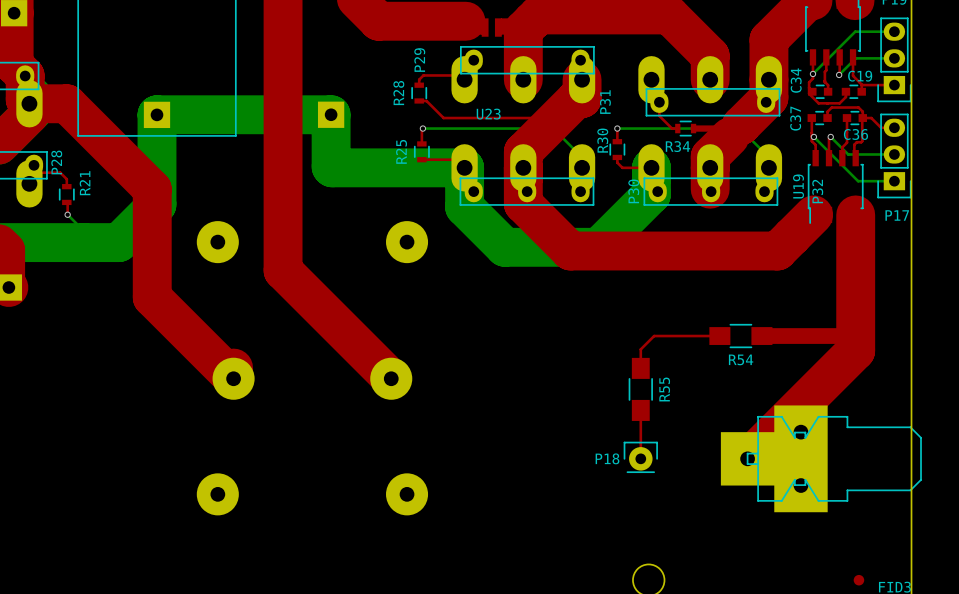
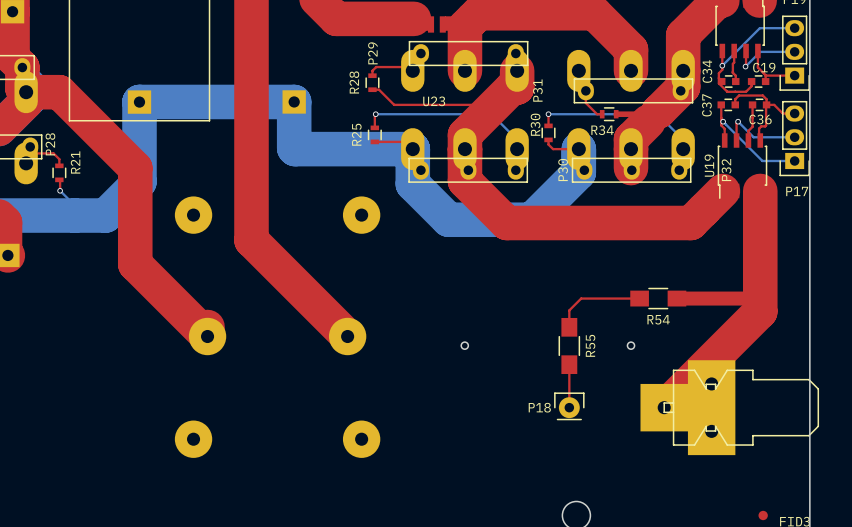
part: none -> (464, 345)
part: none -> (631, 345)

